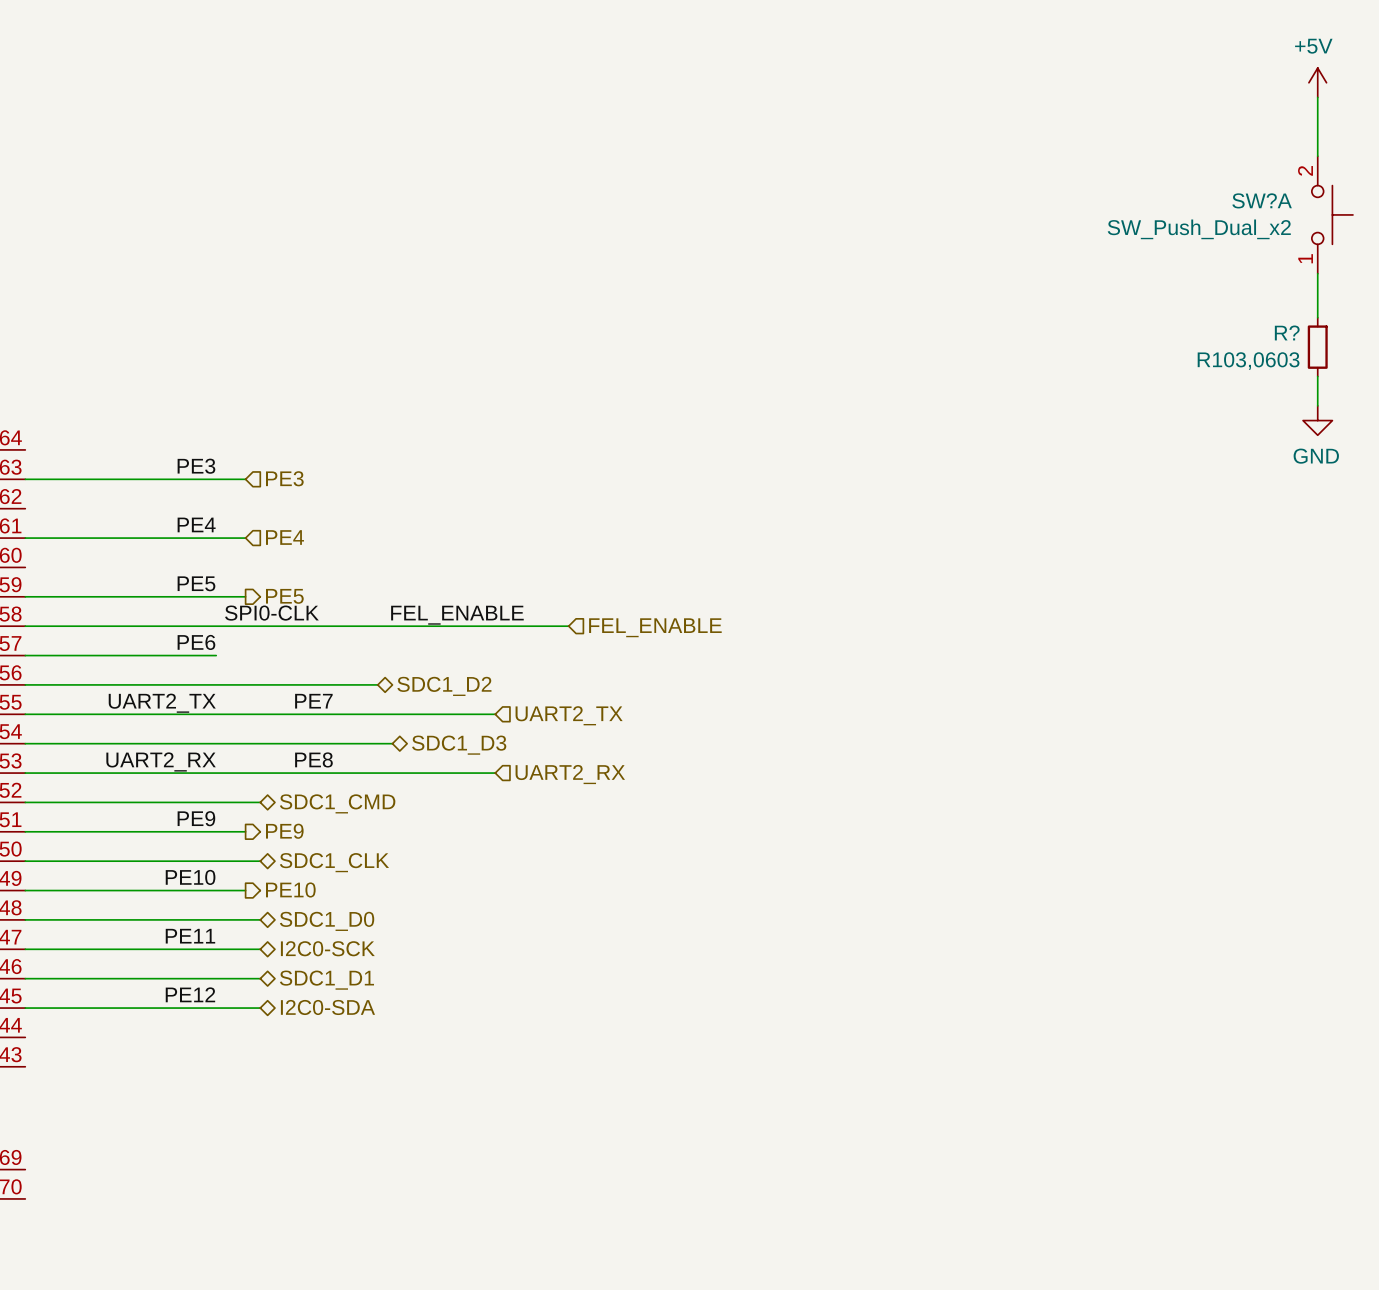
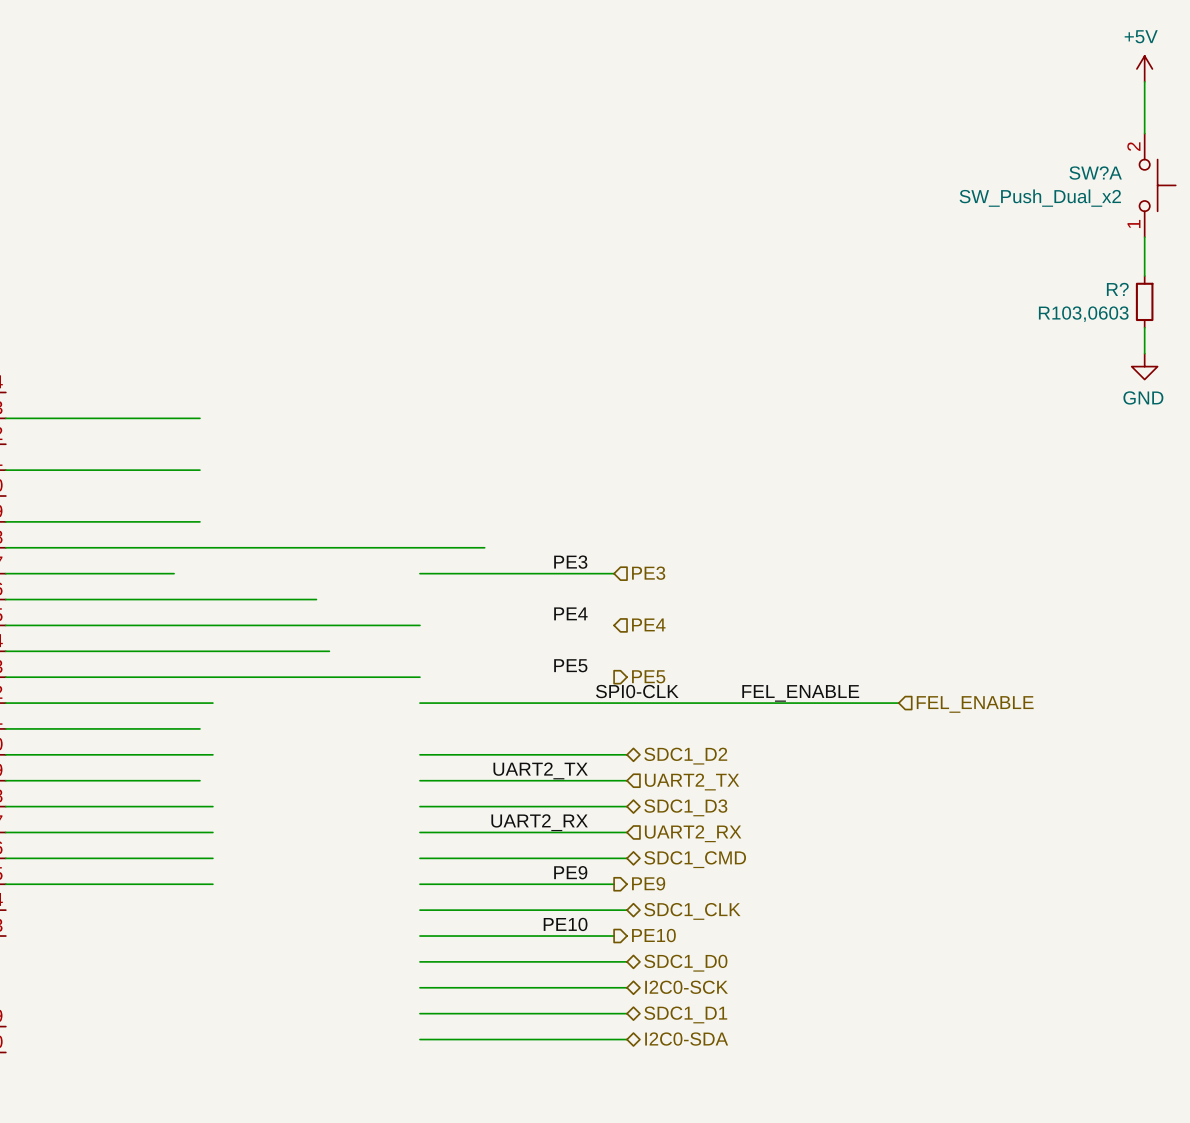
label: PE3 (196, 466) -> none
hierarchical label: PE3 (284, 478) -> none
label: PE4 (196, 524) -> none
hierarchical label: PE4 (284, 537) -> none
label: PE5 (196, 583) -> none
hierarchical label: PE5 (284, 596) -> none
label: SPI0-CLK (271, 613) -> none
label: FEL_ENABLE (457, 615) -> none
hierarchical label: FEL_ENABLE (655, 627) -> none
label: PE6 (196, 642) -> none
label: none -> PE3 (570, 562)
wire: none -> (419, 573) (614, 573)
hierarchical label: none -> PE3 (648, 573)
hierarchical label: SDC1_D2 (444, 686) -> none
label: PE7 (313, 701) -> none
label: none -> PE4 (570, 613)
label: UART2_TX (162, 703) -> none
hierarchical label: none -> PE4 (648, 624)
hierarchical label: UART2_TX (569, 715) -> none
hierarchical label: SDC1_D3 (459, 745) -> none
label: PE8 (313, 759) -> none
label: none -> PE5 (570, 665)
label: UART2_RX (161, 761) -> none
hierarchical label: none -> PE5 (648, 676)
hierarchical label: UART2_RX (570, 774) -> none
label: none -> SPI0-CLK (637, 691)
label: none -> FEL_ENABLE (800, 693)
wire: none -> (419, 703) (898, 703)
hierarchical label: SDC1_CMD (337, 803) -> none
hierarchical label: none -> FEL_ENABLE (975, 704)
label: PE9 (196, 818) -> none
hierarchical label: PE9 (284, 831) -> none
wire: none -> (419, 754) (627, 754)
hierarchical label: SDC1_CLK (334, 862) -> none
hierarchical label: none -> SDC1_D2 (685, 756)
label: PE10 (190, 877) -> none
label: none -> UART2_TX (540, 770)
hierarchical label: PE10 (290, 889) -> none
wire: none -> (419, 780) (627, 780)
hierarchical label: none -> UART2_TX (692, 782)
wire: none -> (419, 806) (627, 806)
hierarchical label: SDC1_D0 (327, 921) -> none
hierarchical label: none -> SDC1_D3 (685, 807)
label: PE11 (190, 936) -> none
label: none -> UART2_RX (539, 822)
hierarchical label: I2C0-SCK (327, 948) -> none
wire: none -> (419, 832) (627, 832)
hierarchical label: none -> UART2_RX (693, 833)
wire: none -> (419, 858) (627, 858)
hierarchical label: SDC1_D1 (326, 980) -> none
hierarchical label: none -> SDC1_CMD (695, 859)
label: PE12 (190, 994) -> none
label: none -> PE9 (570, 872)
hierarchical label: I2C0-SDA (327, 1007) -> none
hierarchical label: none -> PE9 (648, 883)
wire: none -> (419, 884) (614, 884)
wire: none -> (419, 910) (627, 910)
hierarchical label: none -> SDC1_CLK (692, 911)
label: none -> PE10 (565, 924)
wire: none -> (419, 936) (614, 936)
hierarchical label: none -> PE10 (653, 935)
wire: none -> (419, 961) (627, 961)
hierarchical label: none -> SDC1_D0 (685, 963)
hierarchical label: none -> I2C0-SCK (686, 987)
wire: none -> (419, 987) (627, 987)
wire: none -> (419, 1013) (627, 1013)
hierarchical label: none -> SDC1_D1 (685, 1014)
hierarchical label: none -> I2C0-SDA (686, 1039)
wire: none -> (419, 1039) (627, 1039)

